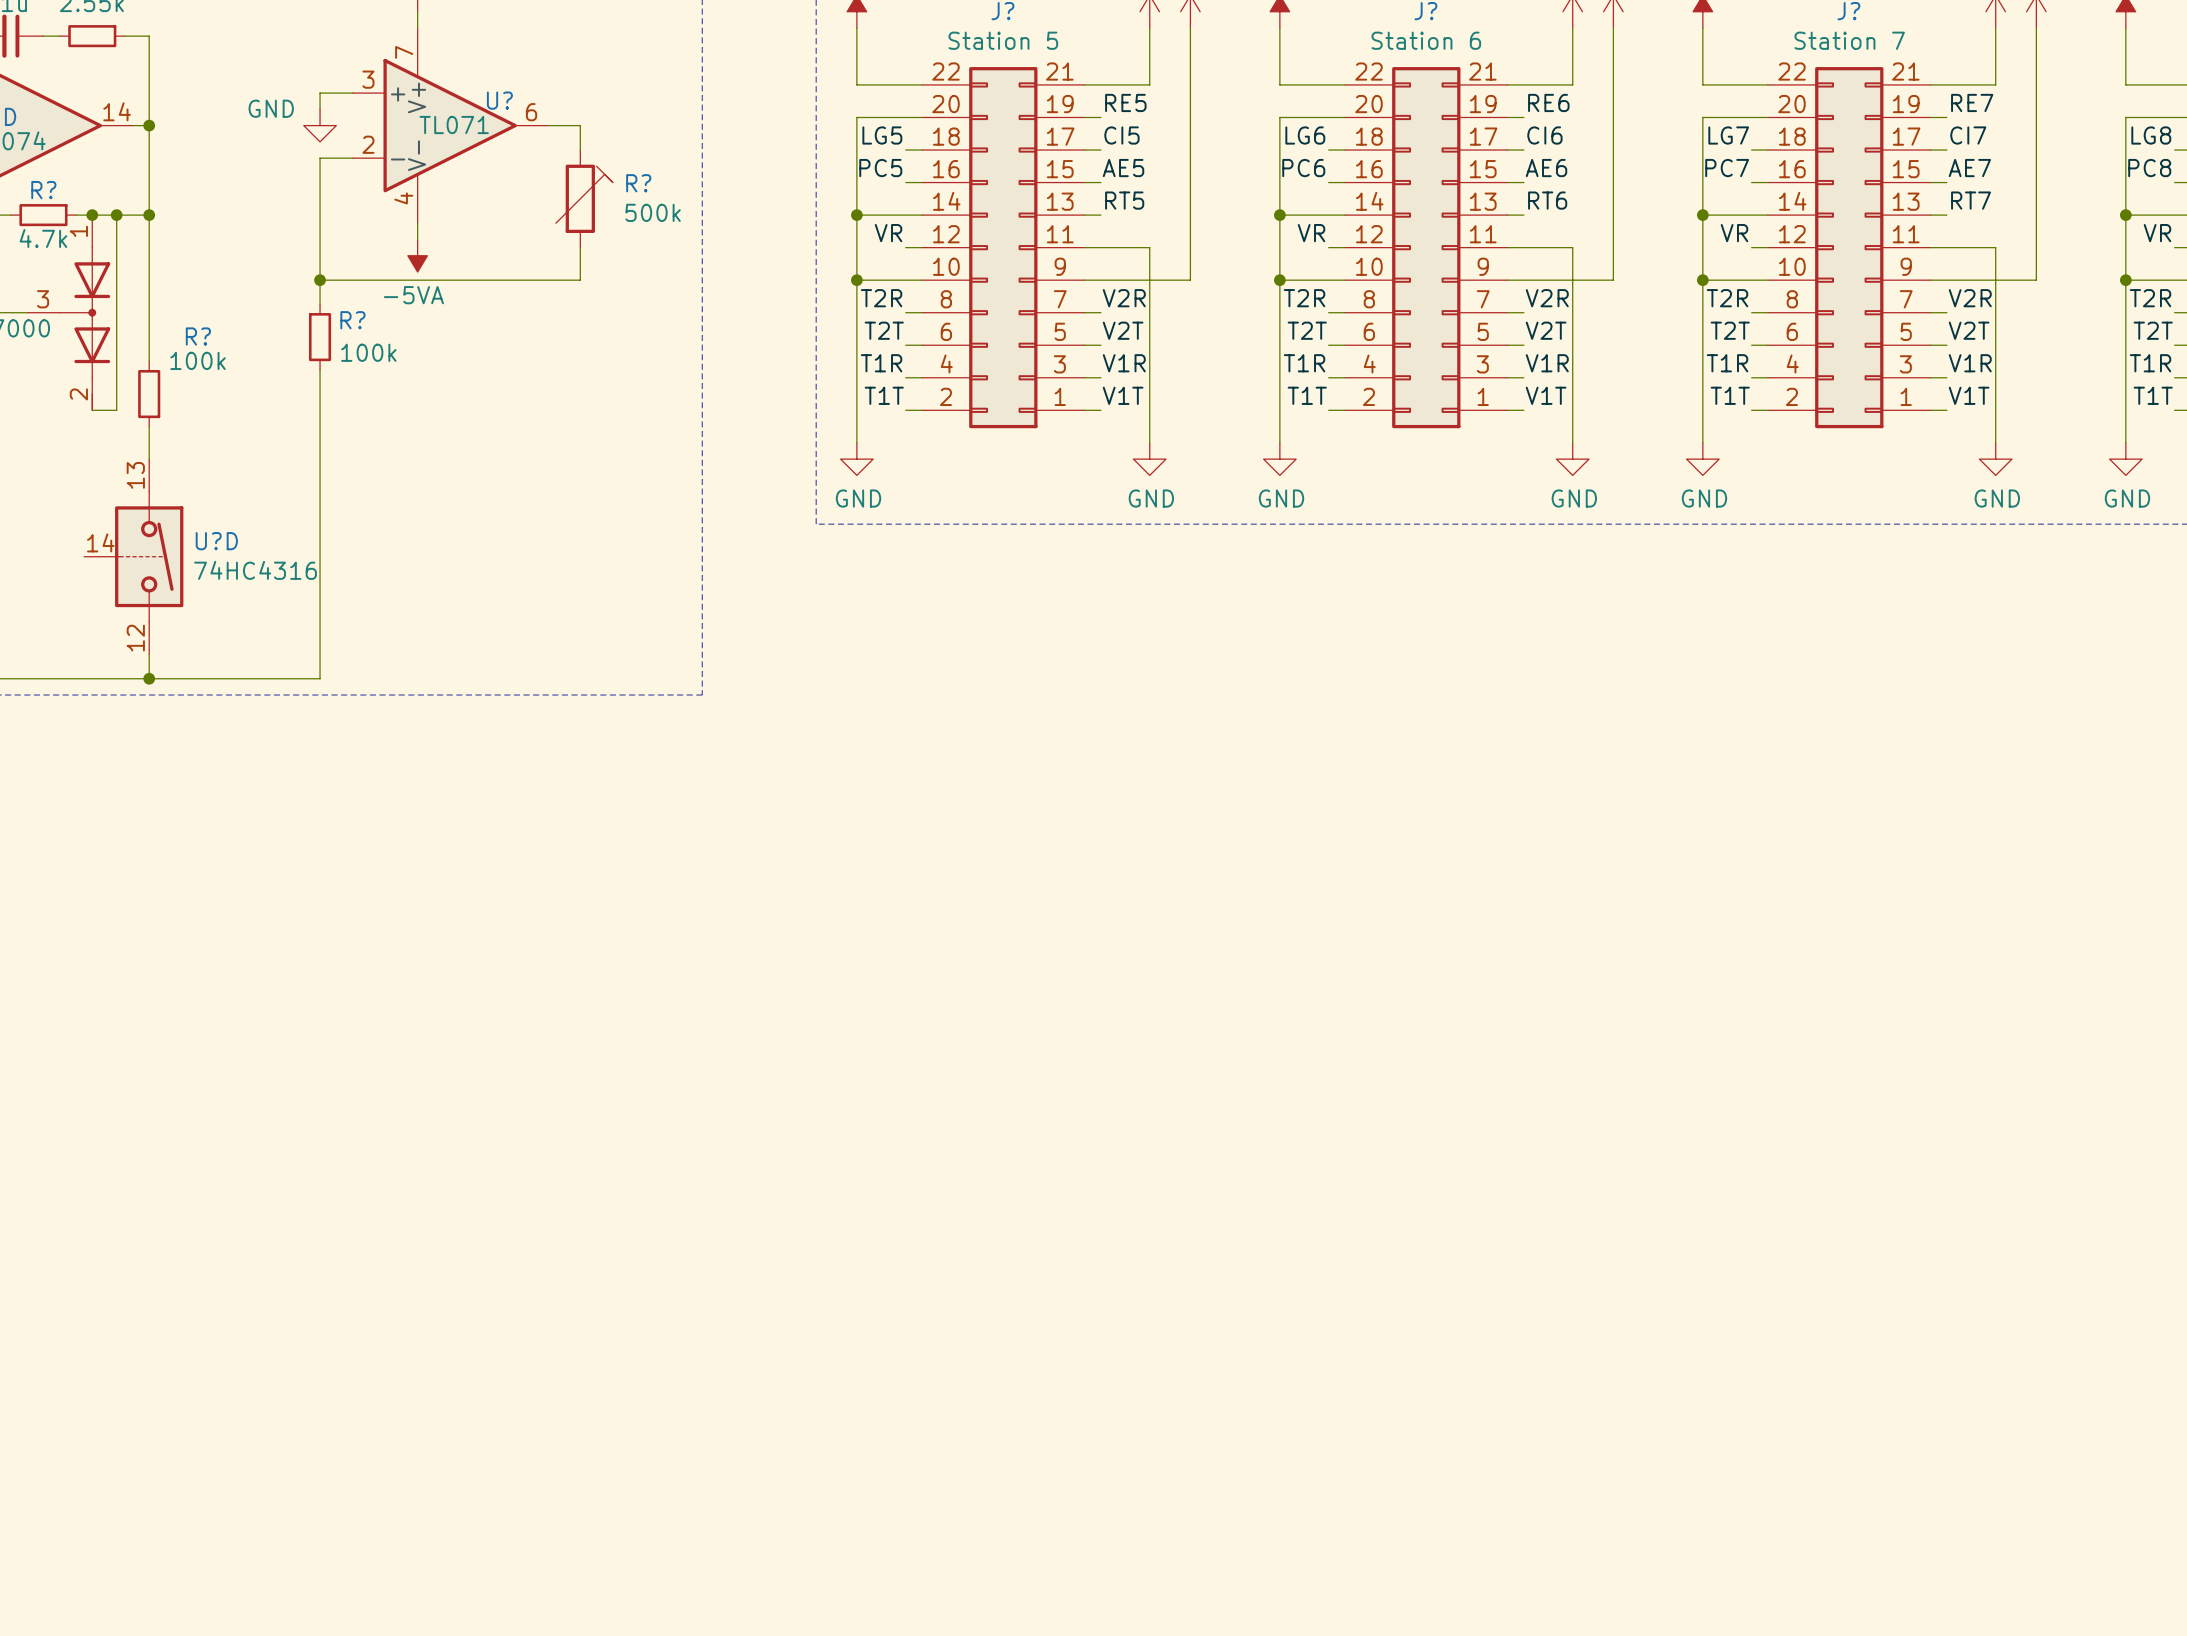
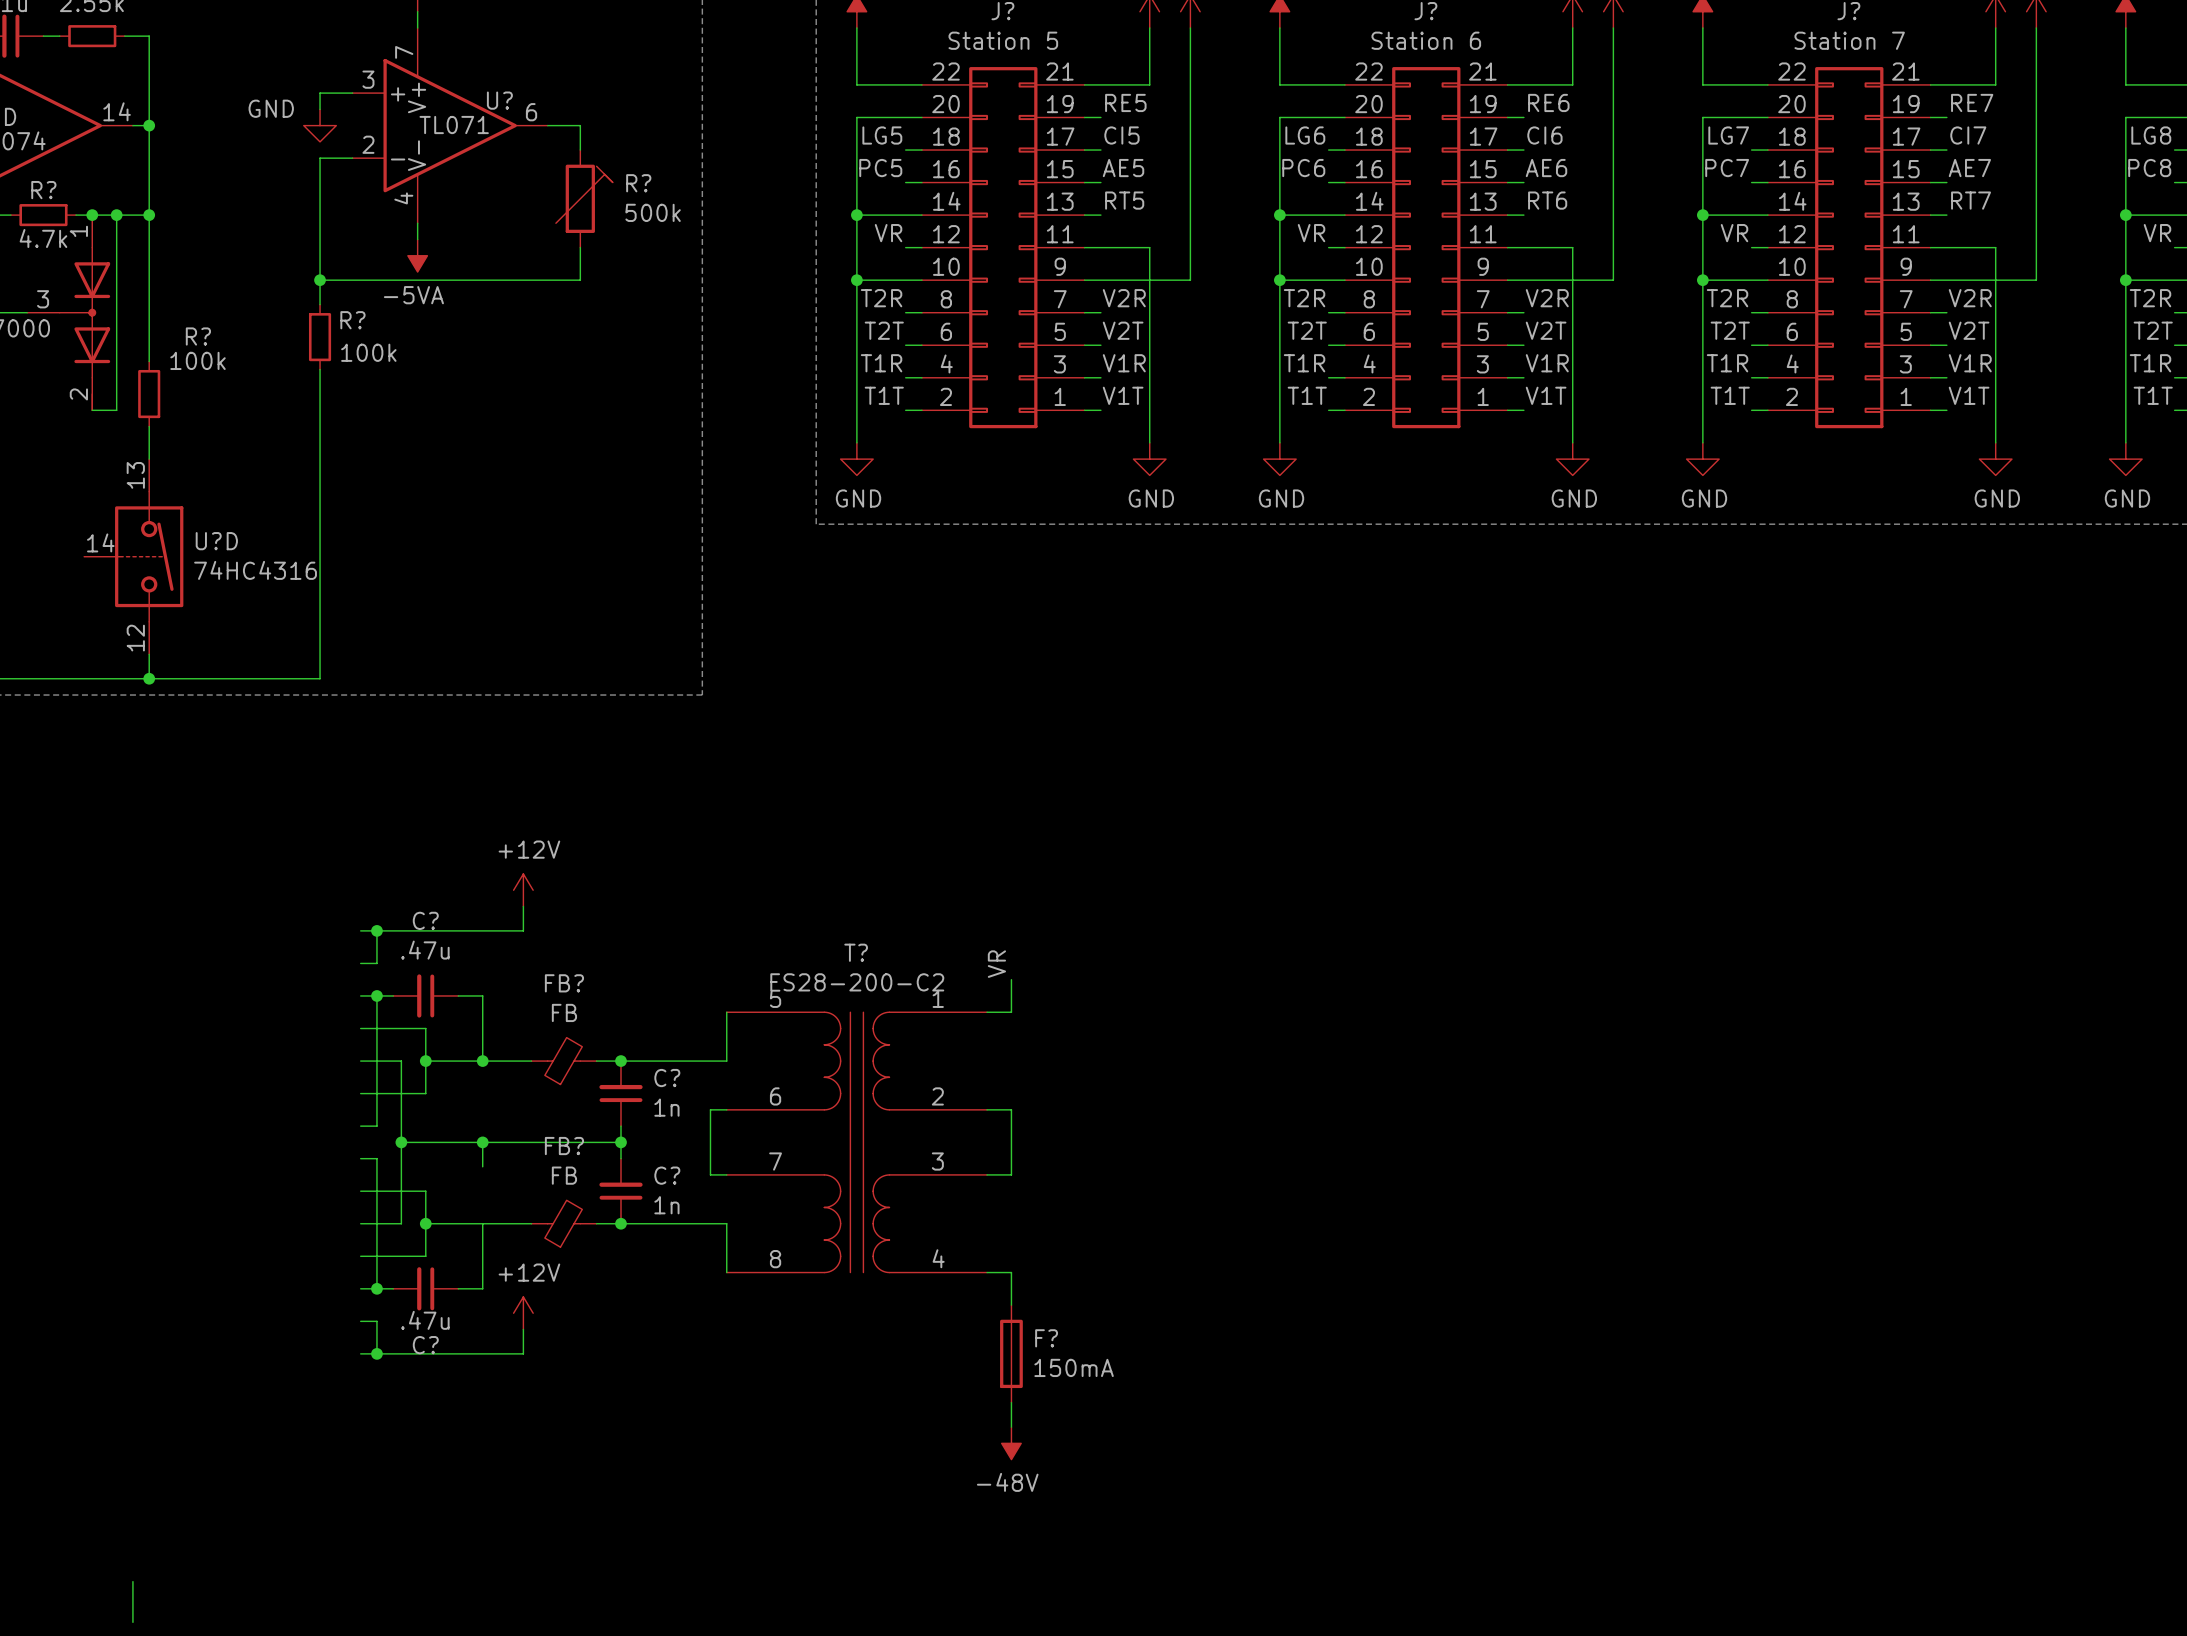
power symbol: none -> +12V (523, 890)
wire: none -> (523, 906) (523, 930) (360, 930)
wire: none -> (376, 930) (376, 963) (360, 963)
junction: none -> (376, 930)
label: none -> VR (996, 964)
wire: none -> (1011, 979) (1011, 1012) (987, 1012)
wire: none -> (360, 995) (393, 995)
wire: none -> (376, 995) (376, 1126) (360, 1126)
junction: none -> (376, 995)
C?: none -> .47u (425, 995)
wire: none -> (458, 995) (482, 995) (482, 1061)
wire: none -> (726, 1012) (726, 1061) (596, 1061)
wire: none -> (360, 1028) (425, 1028) (425, 1093) (360, 1093)
wire: none -> (360, 1061) (401, 1061) (401, 1223) (360, 1223)
wire: none -> (425, 1061) (531, 1061)
junction: none -> (425, 1061)
junction: none -> (482, 1061)
FB?: none -> FB (564, 1061)
junction: none -> (621, 1061)
C?: none -> 1n (621, 1093)
wire: none -> (726, 1109) (710, 1109) (710, 1174) (726, 1174)
wire: none -> (987, 1109) (1011, 1109) (1011, 1174) (987, 1174)
wire: none -> (621, 1126) (621, 1158)
wire: none -> (401, 1142) (621, 1142)
junction: none -> (401, 1142)
wire: none -> (482, 1142) (482, 1166)
junction: none -> (482, 1142)
junction: none -> (621, 1142)
T?: none -> FS28-200-C2 (856, 1142)
wire: none -> (360, 1158) (376, 1158) (376, 1288)
wire: none -> (360, 1191) (425, 1191) (425, 1256) (360, 1256)
C?: none -> 1n (621, 1191)
wire: none -> (425, 1223) (531, 1223)
junction: none -> (425, 1223)
wire: none -> (482, 1223) (482, 1288) (458, 1288)
FB?: none -> FB (564, 1223)
wire: none -> (596, 1223) (726, 1223) (726, 1272)
junction: none -> (621, 1223)
wire: none -> (987, 1272) (1011, 1272) (1011, 1305)
wire: none -> (360, 1288) (393, 1288)
junction: none -> (376, 1288)
C?: none -> .47u (425, 1288)
power symbol: none -> +12V (523, 1313)
wire: none -> (360, 1321) (376, 1321) (376, 1353)
wire: none -> (523, 1329) (523, 1353) (360, 1353)
junction: none -> (376, 1353)
F?: none -> 150mA (1011, 1353)
wire: none -> (1011, 1402) (1011, 1427)
power symbol: none -> -48V (1011, 1443)
wire: none -> (132, 1581) (132, 1622)

